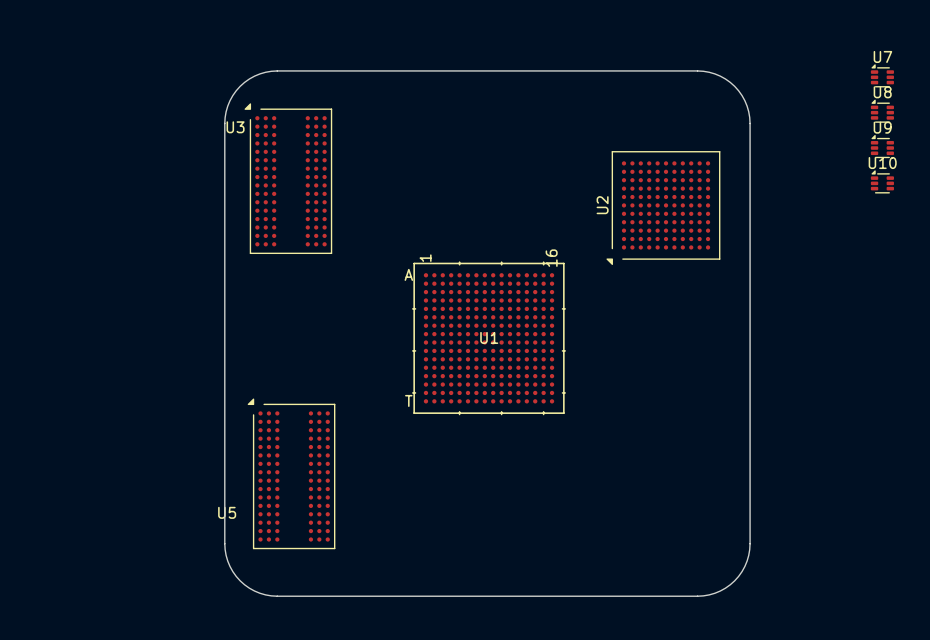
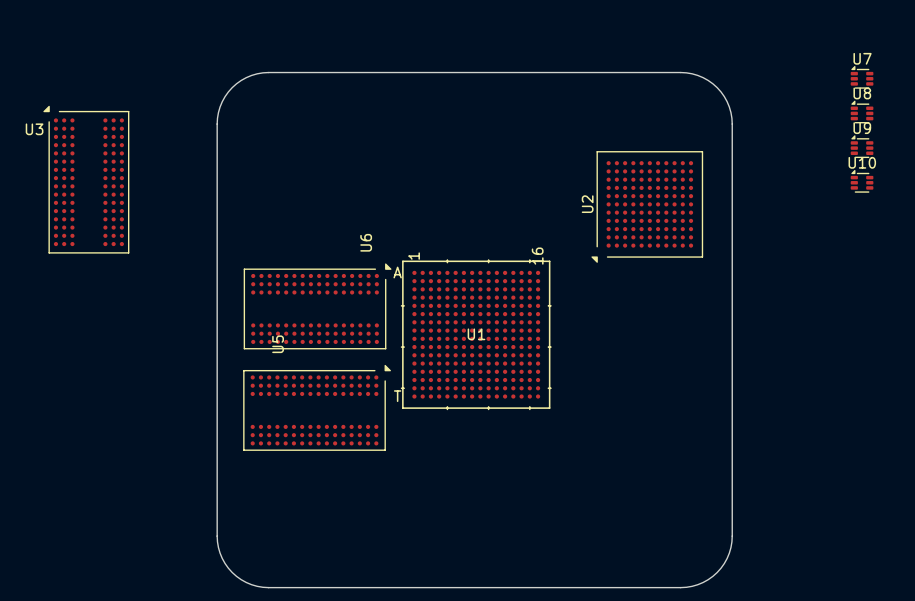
U3 position: (288, 178) -> (86, 179)
U6: none -> (317, 306)
U5 rotation: 0° (291, 473) -> 90° clockwise (317, 407)

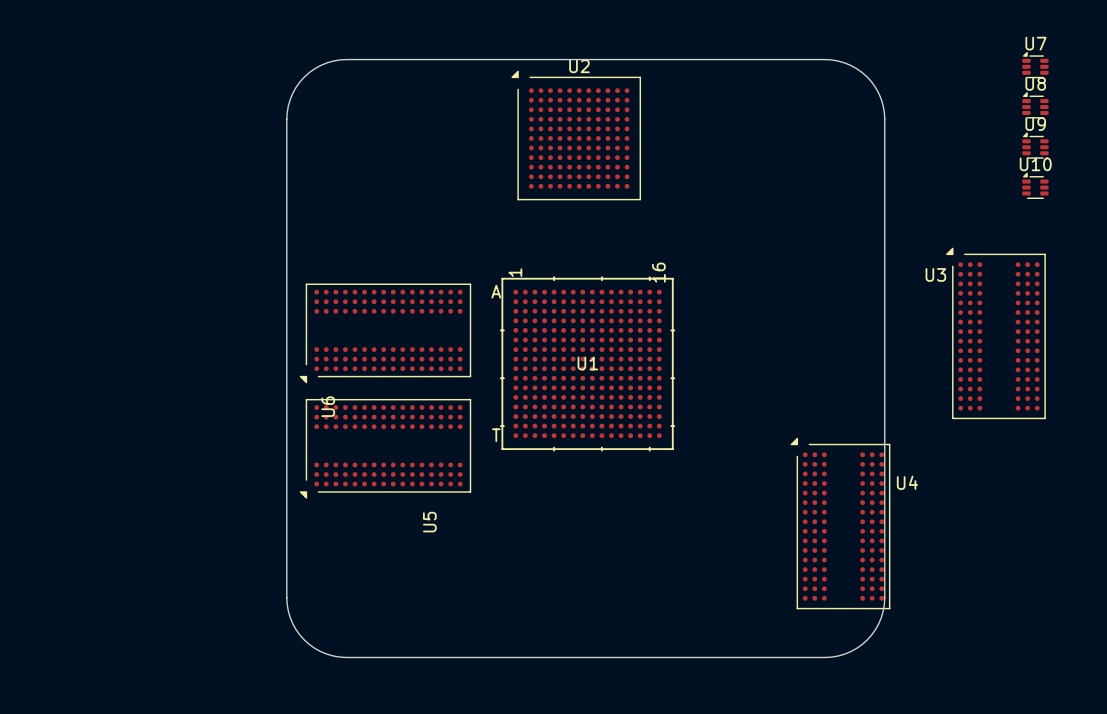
U3 position: (86, 179) -> (995, 333)
U2 rotation: 0° (647, 206) -> 90° clockwise (576, 135)
U2 position: (647, 206) -> (576, 135)
U6 rotation: 0° (317, 306) -> 180° (385, 333)
U5 rotation: 0° (317, 407) -> 180° (385, 448)
U4: none -> (840, 523)

